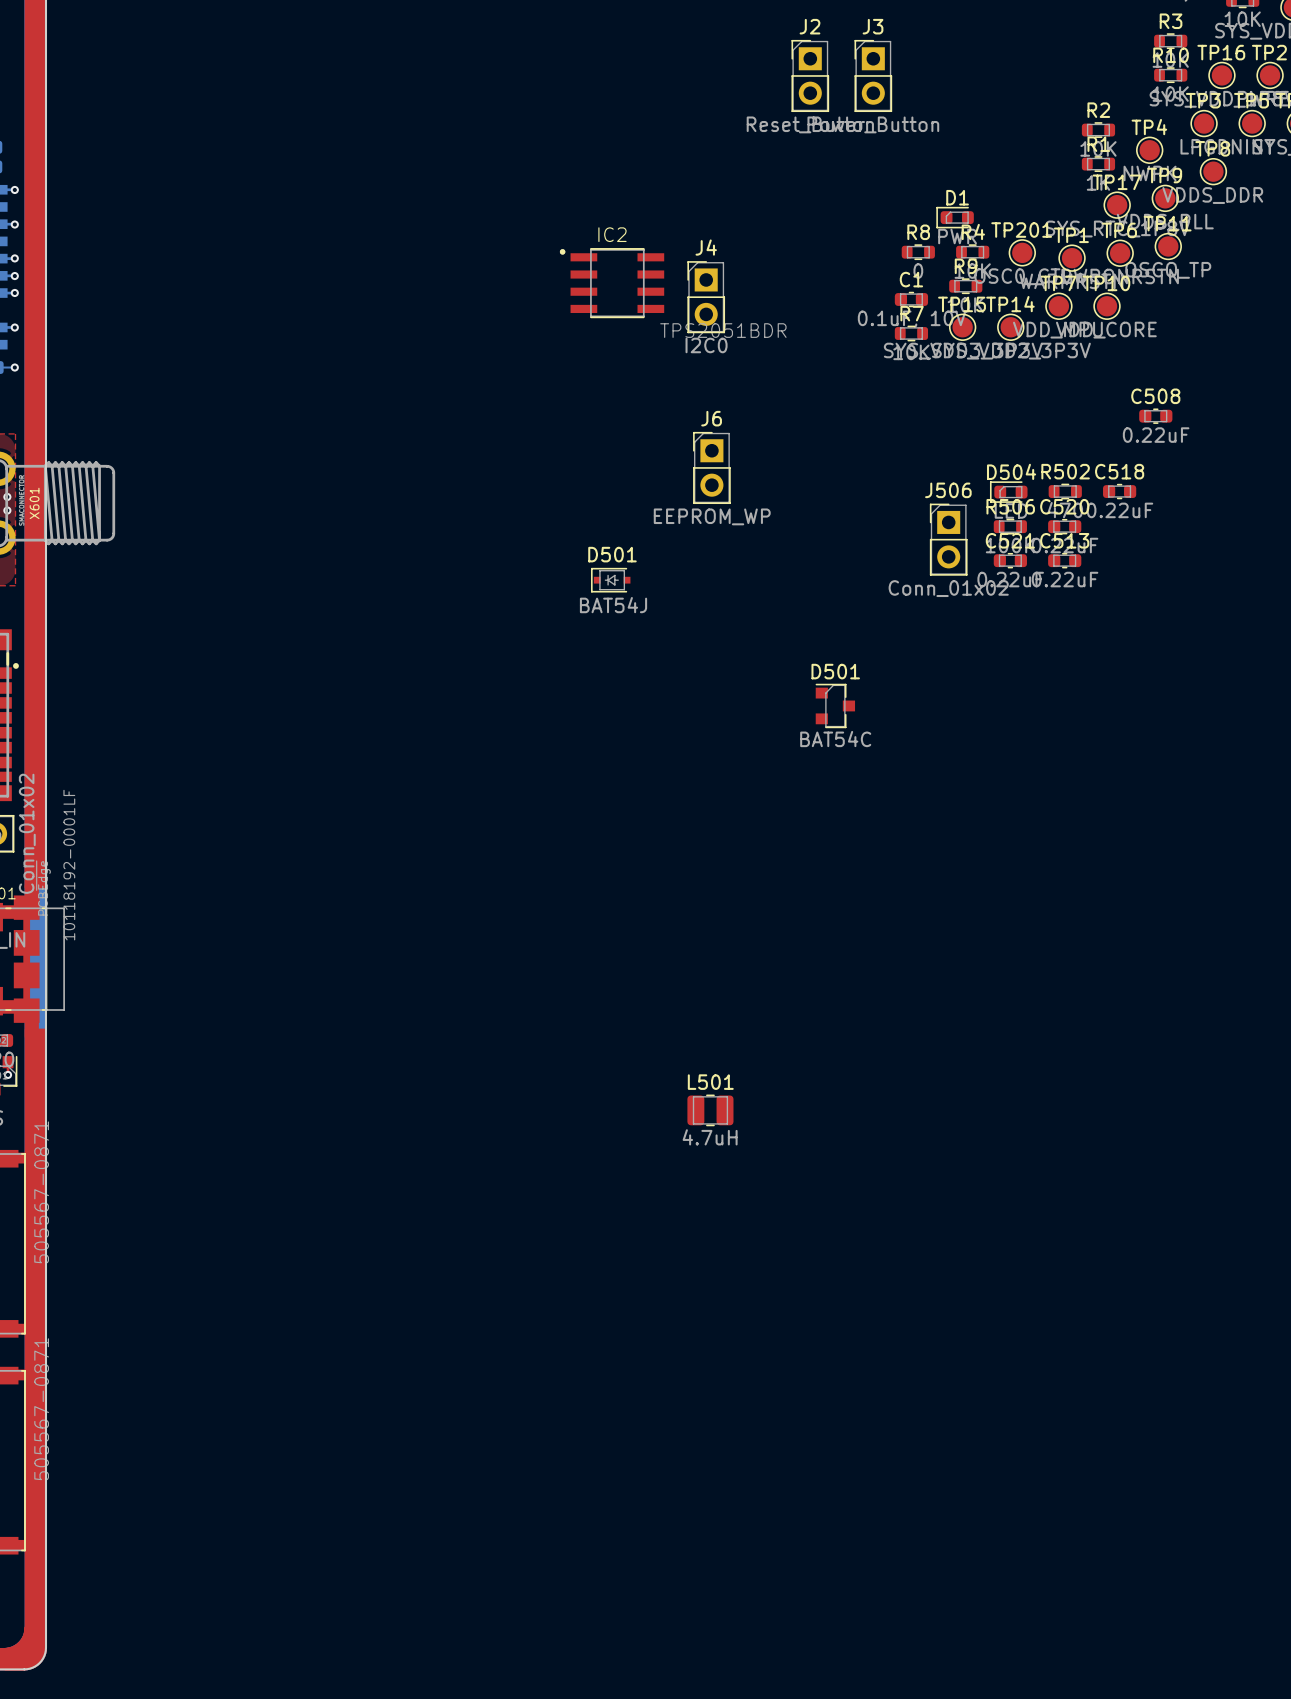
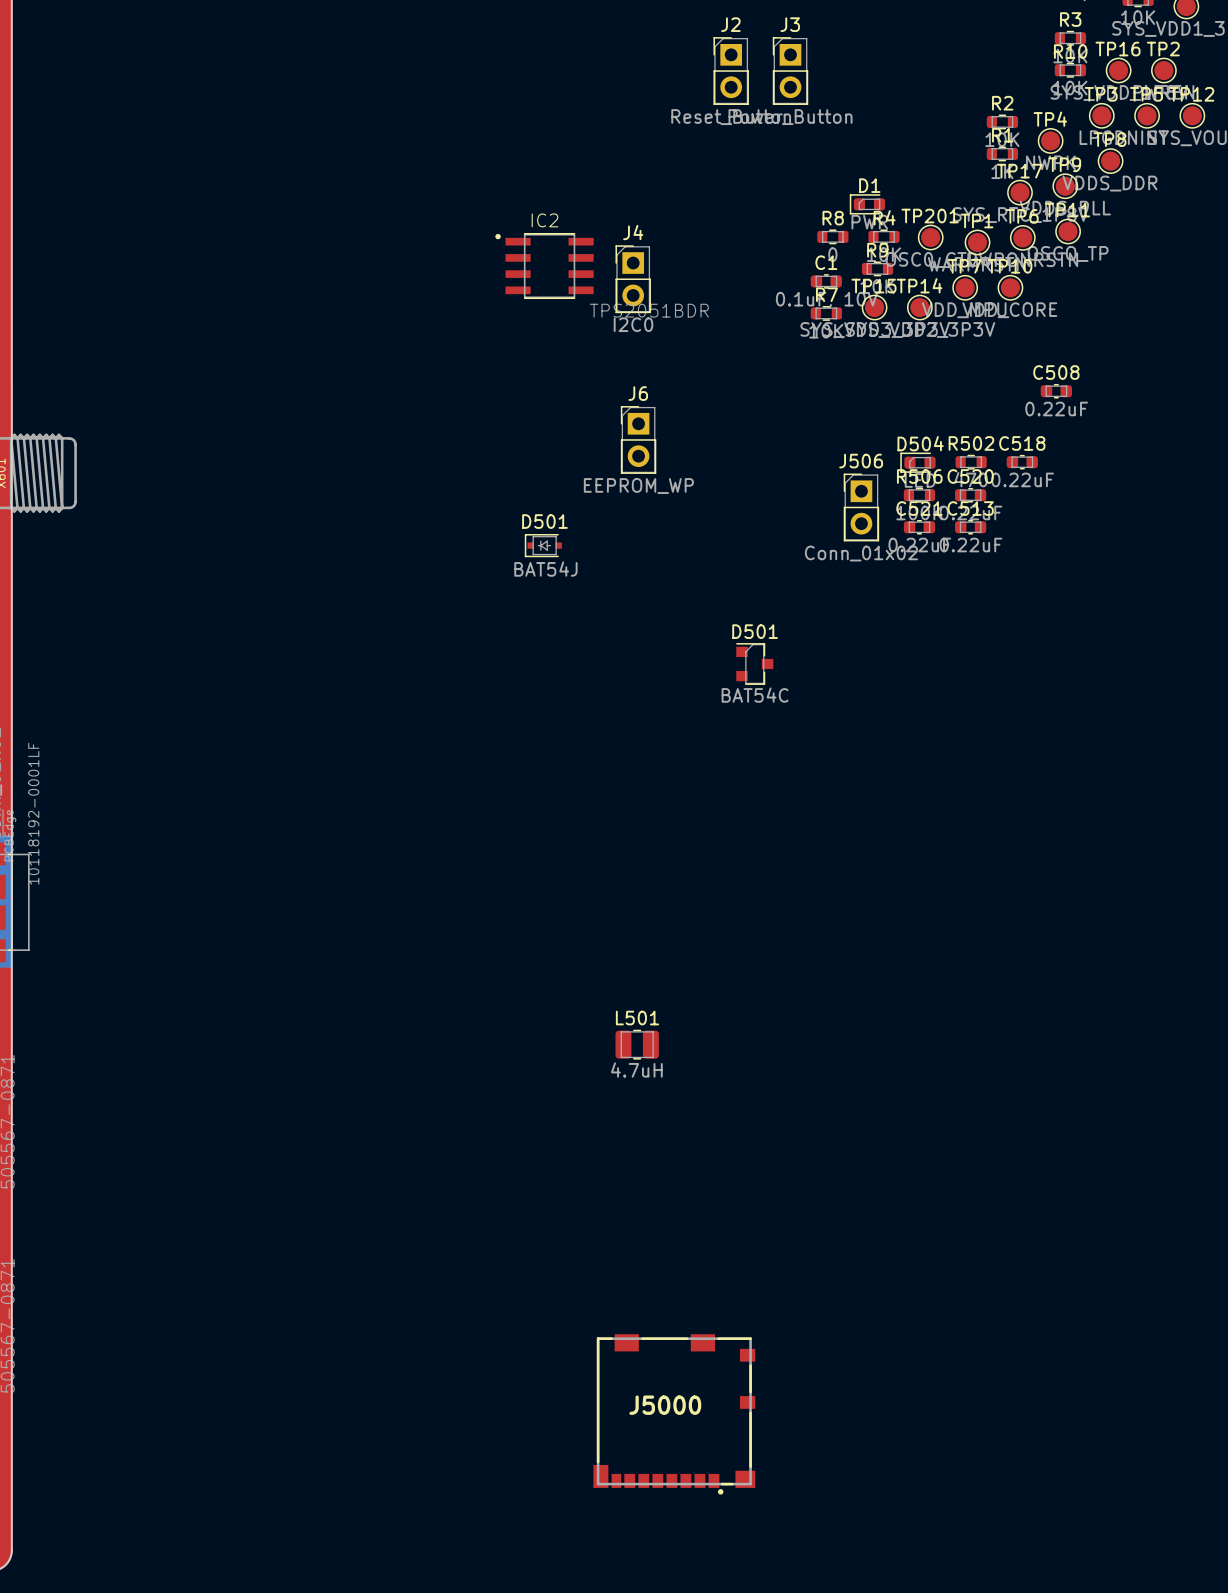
J5000: none -> (674, 1414)

